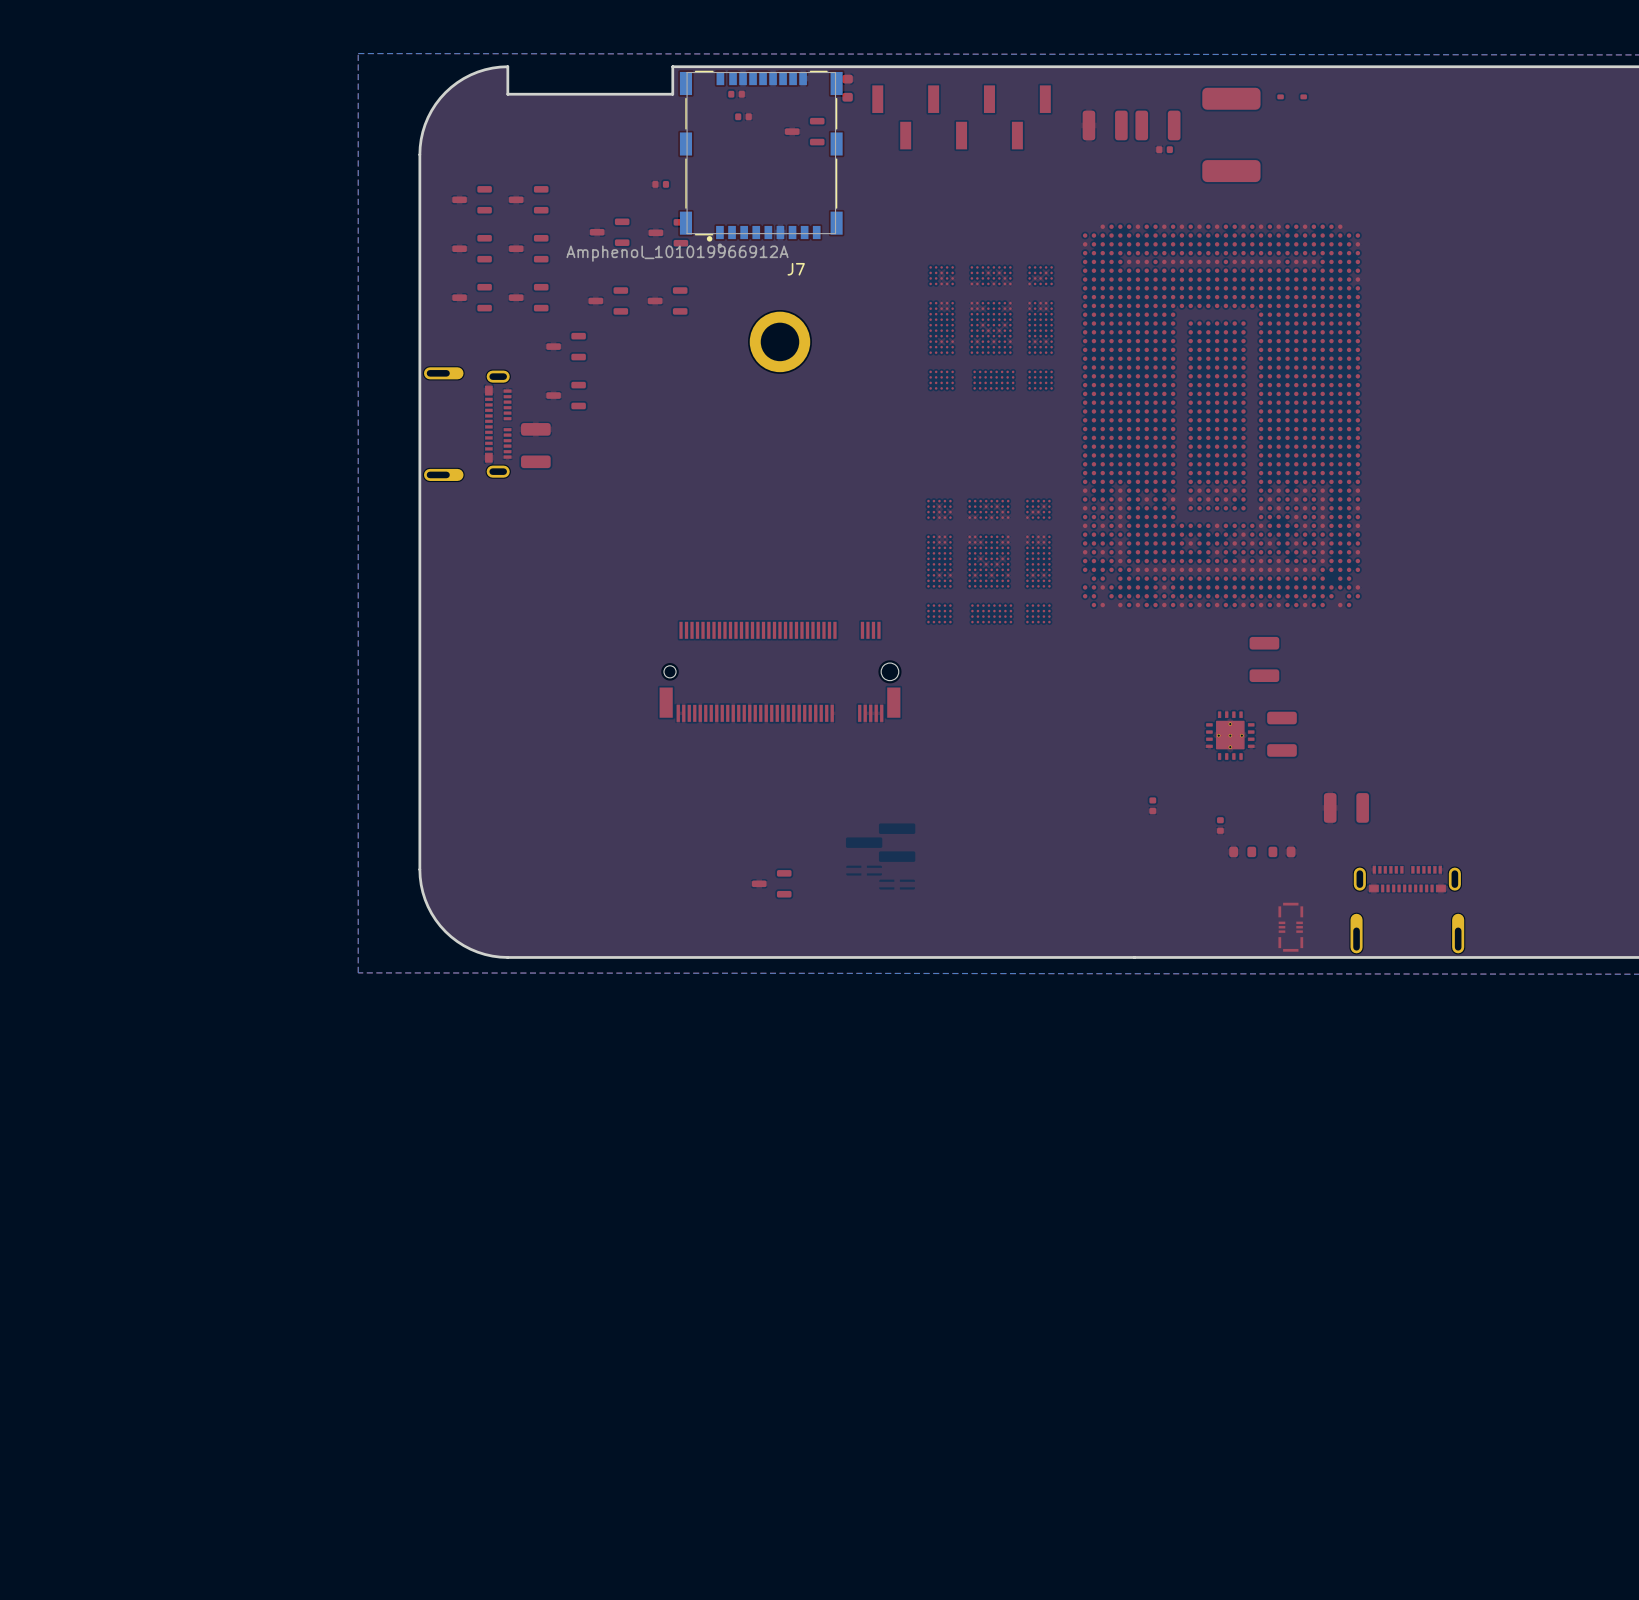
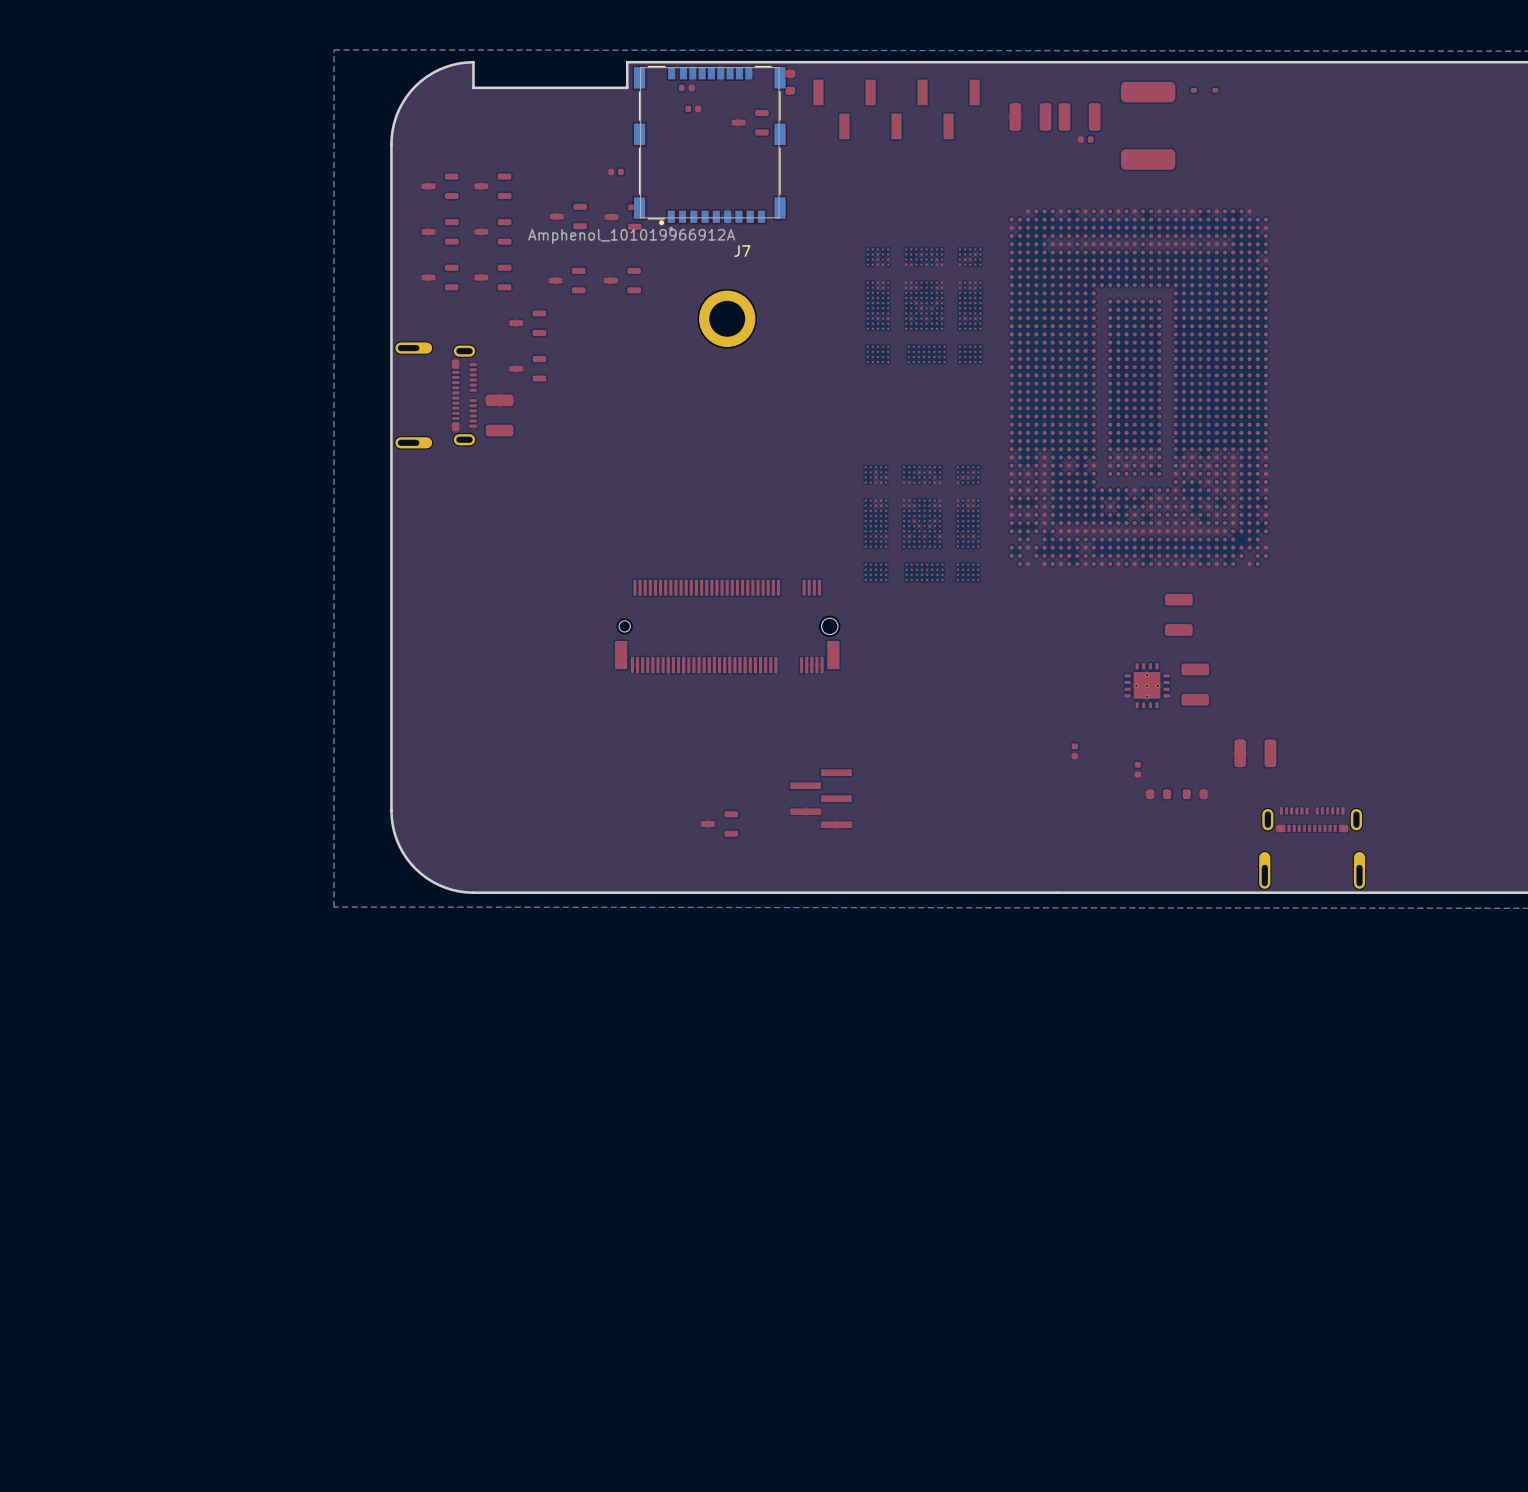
part: none -> (821, 798)
part: (1290, 927) -> none

